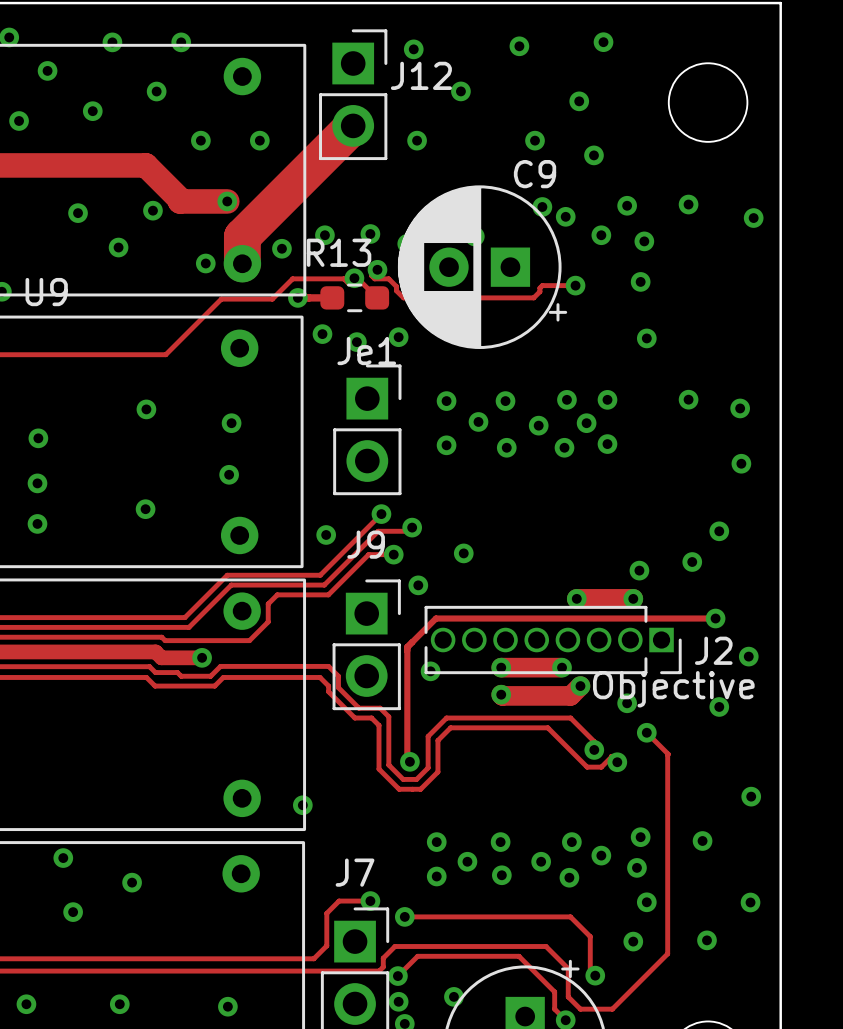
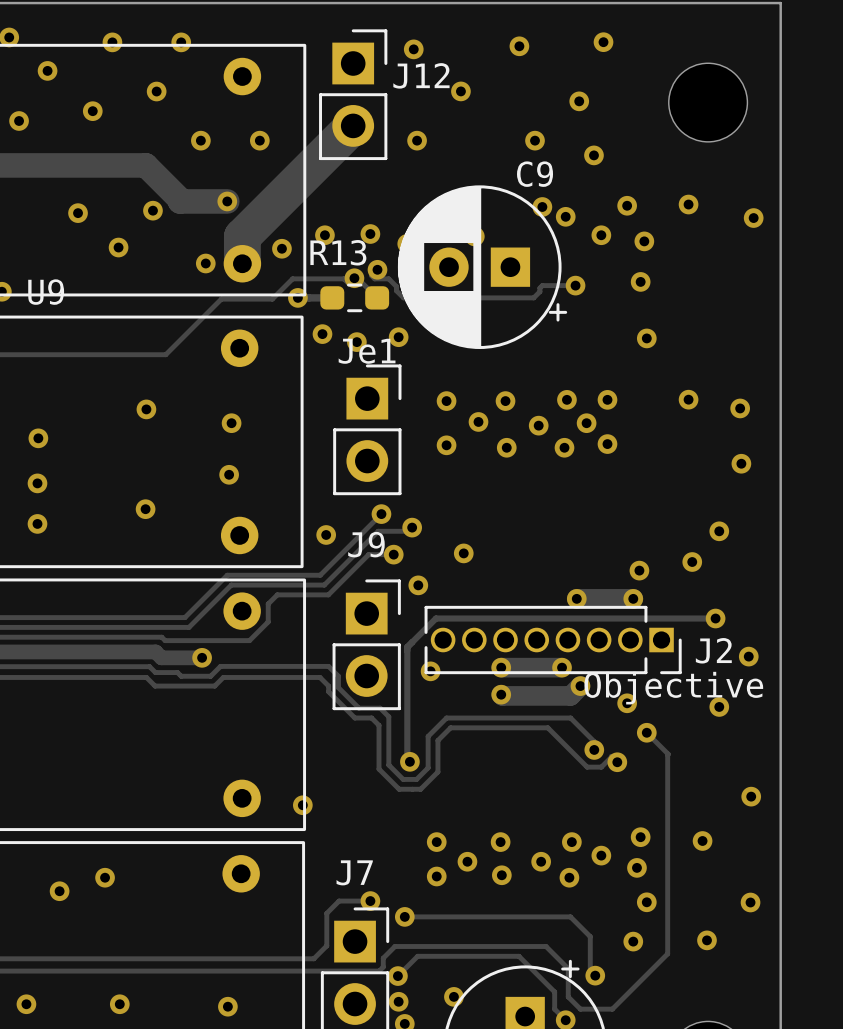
via: (63, 858) -> none
via: none -> (105, 877)
via: (132, 882) -> none
via: none -> (59, 891)
via: (73, 912) -> none

